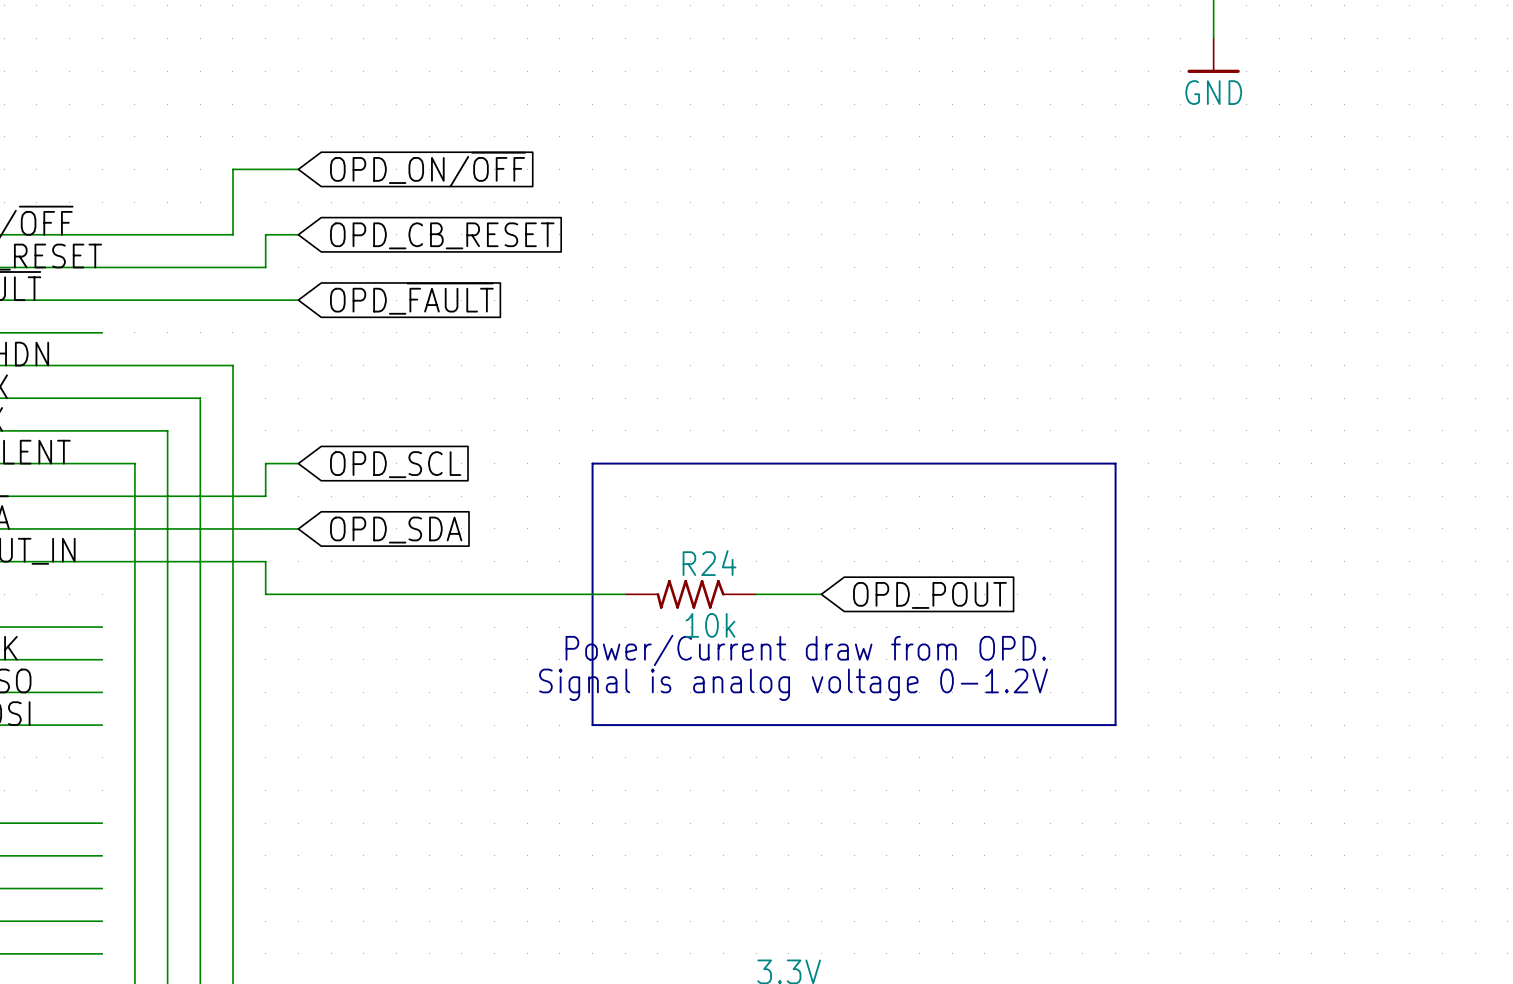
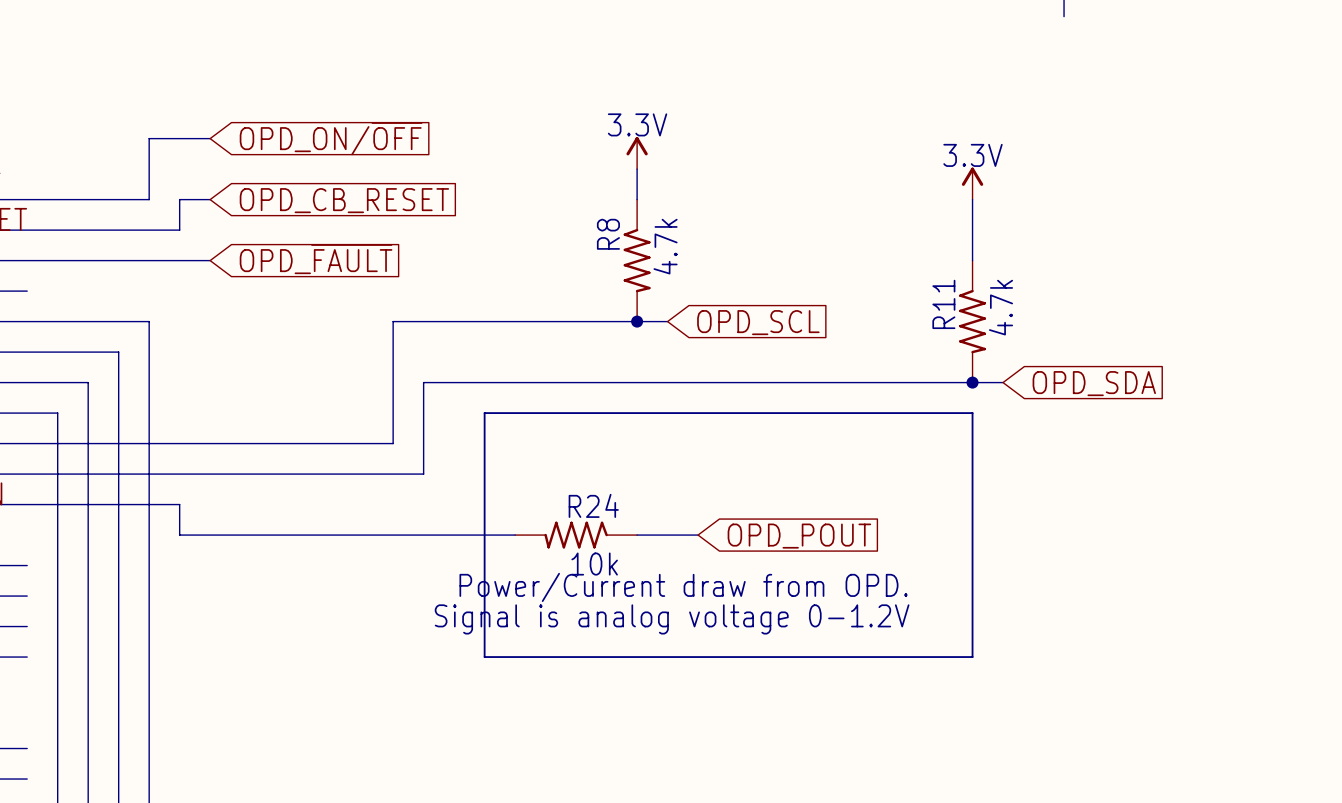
power symbol: GND (1213, 55) -> none
power symbol: none -> 3.3V (637, 153)
wire: none -> (637, 169) (637, 199)
power symbol: none -> 3.3V (972, 183)
wire: none -> (972, 199) (972, 260)
R8: none -> 4.7k (637, 260)
junction: none -> (637, 321)
R11: none -> 4.7k (972, 321)
global label: none -> OPD_SCL (758, 322)
junction: none -> (972, 382)
wire: none -> (1003, 382) (423, 382) (423, 474) (210, 474)
global label: none -> OPD_SDA (1094, 383)
wire: (298, 463) (265, 463) (265, 496) -> (667, 321) (393, 321) (393, 443) (179, 443)
global label: OPD_SCL (395, 464) -> none
global label: OPD_SDA (396, 530) -> none

